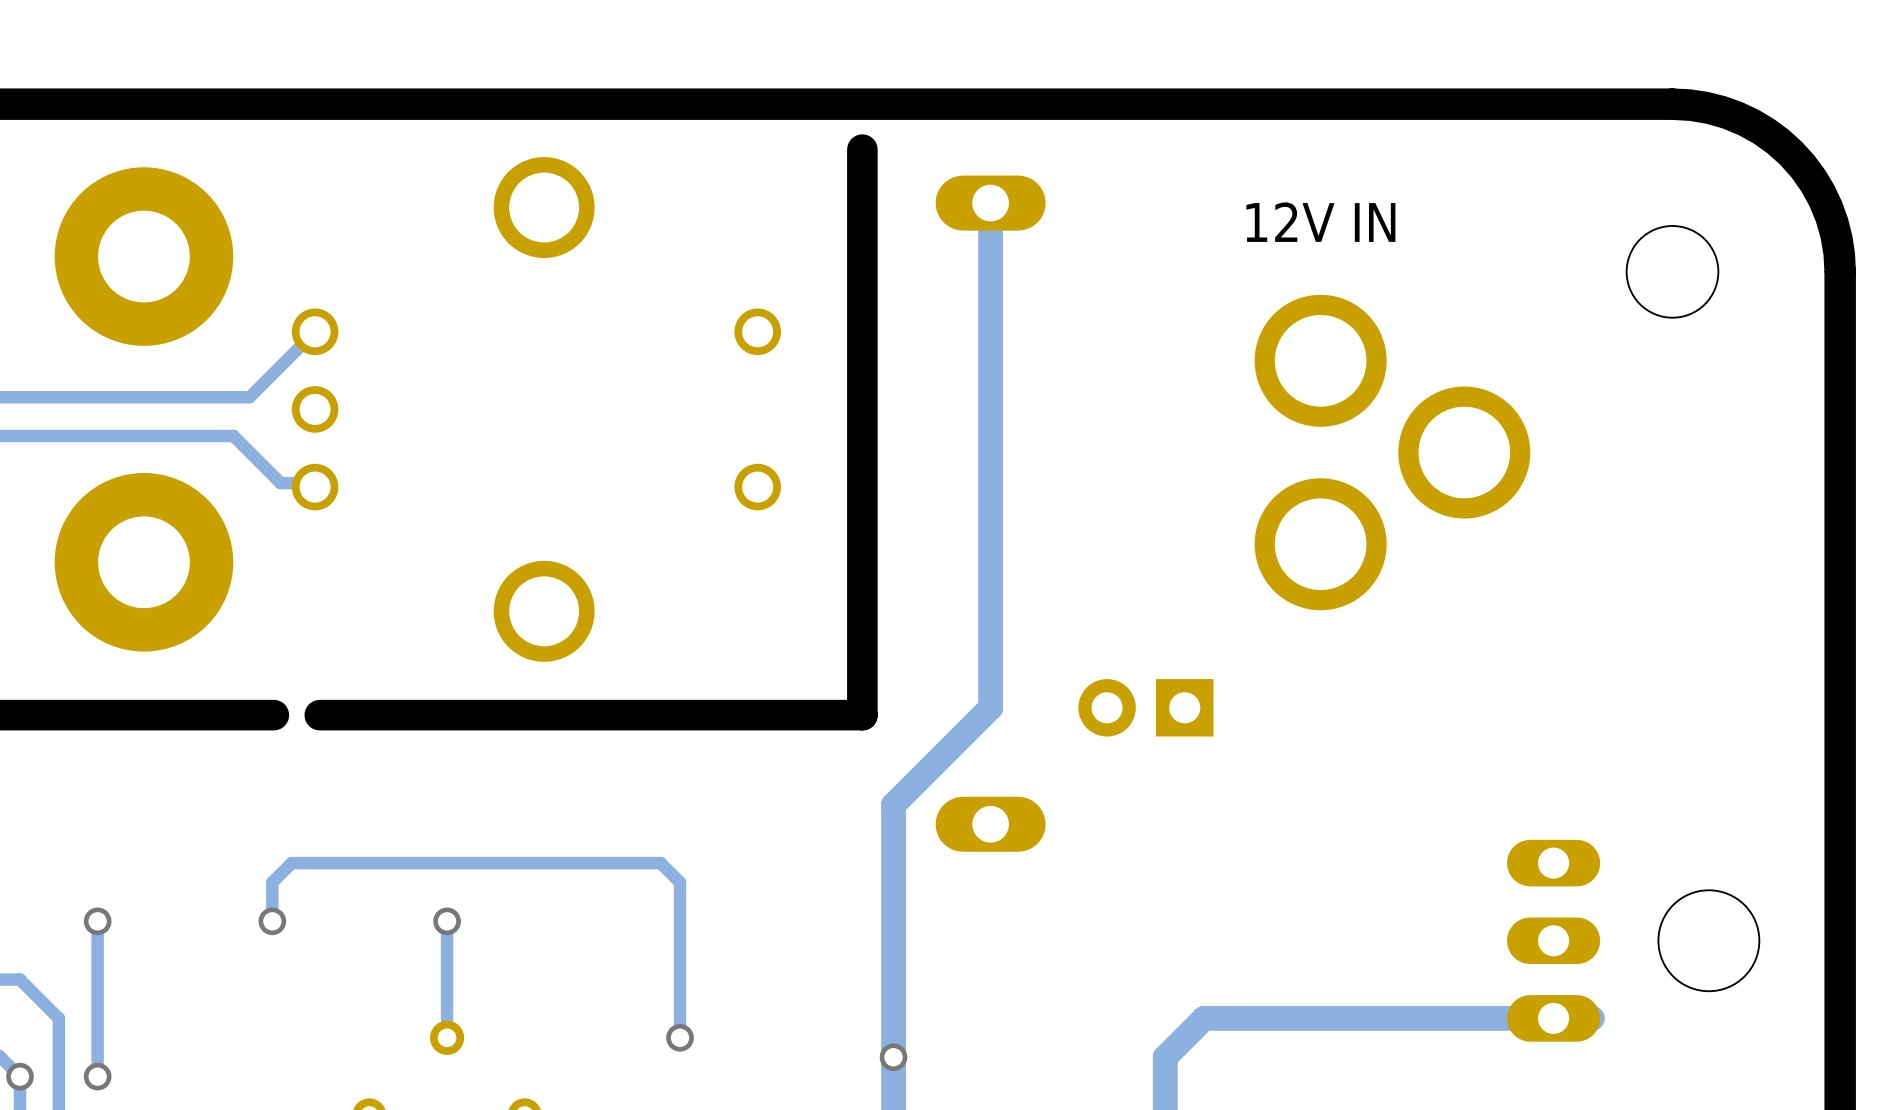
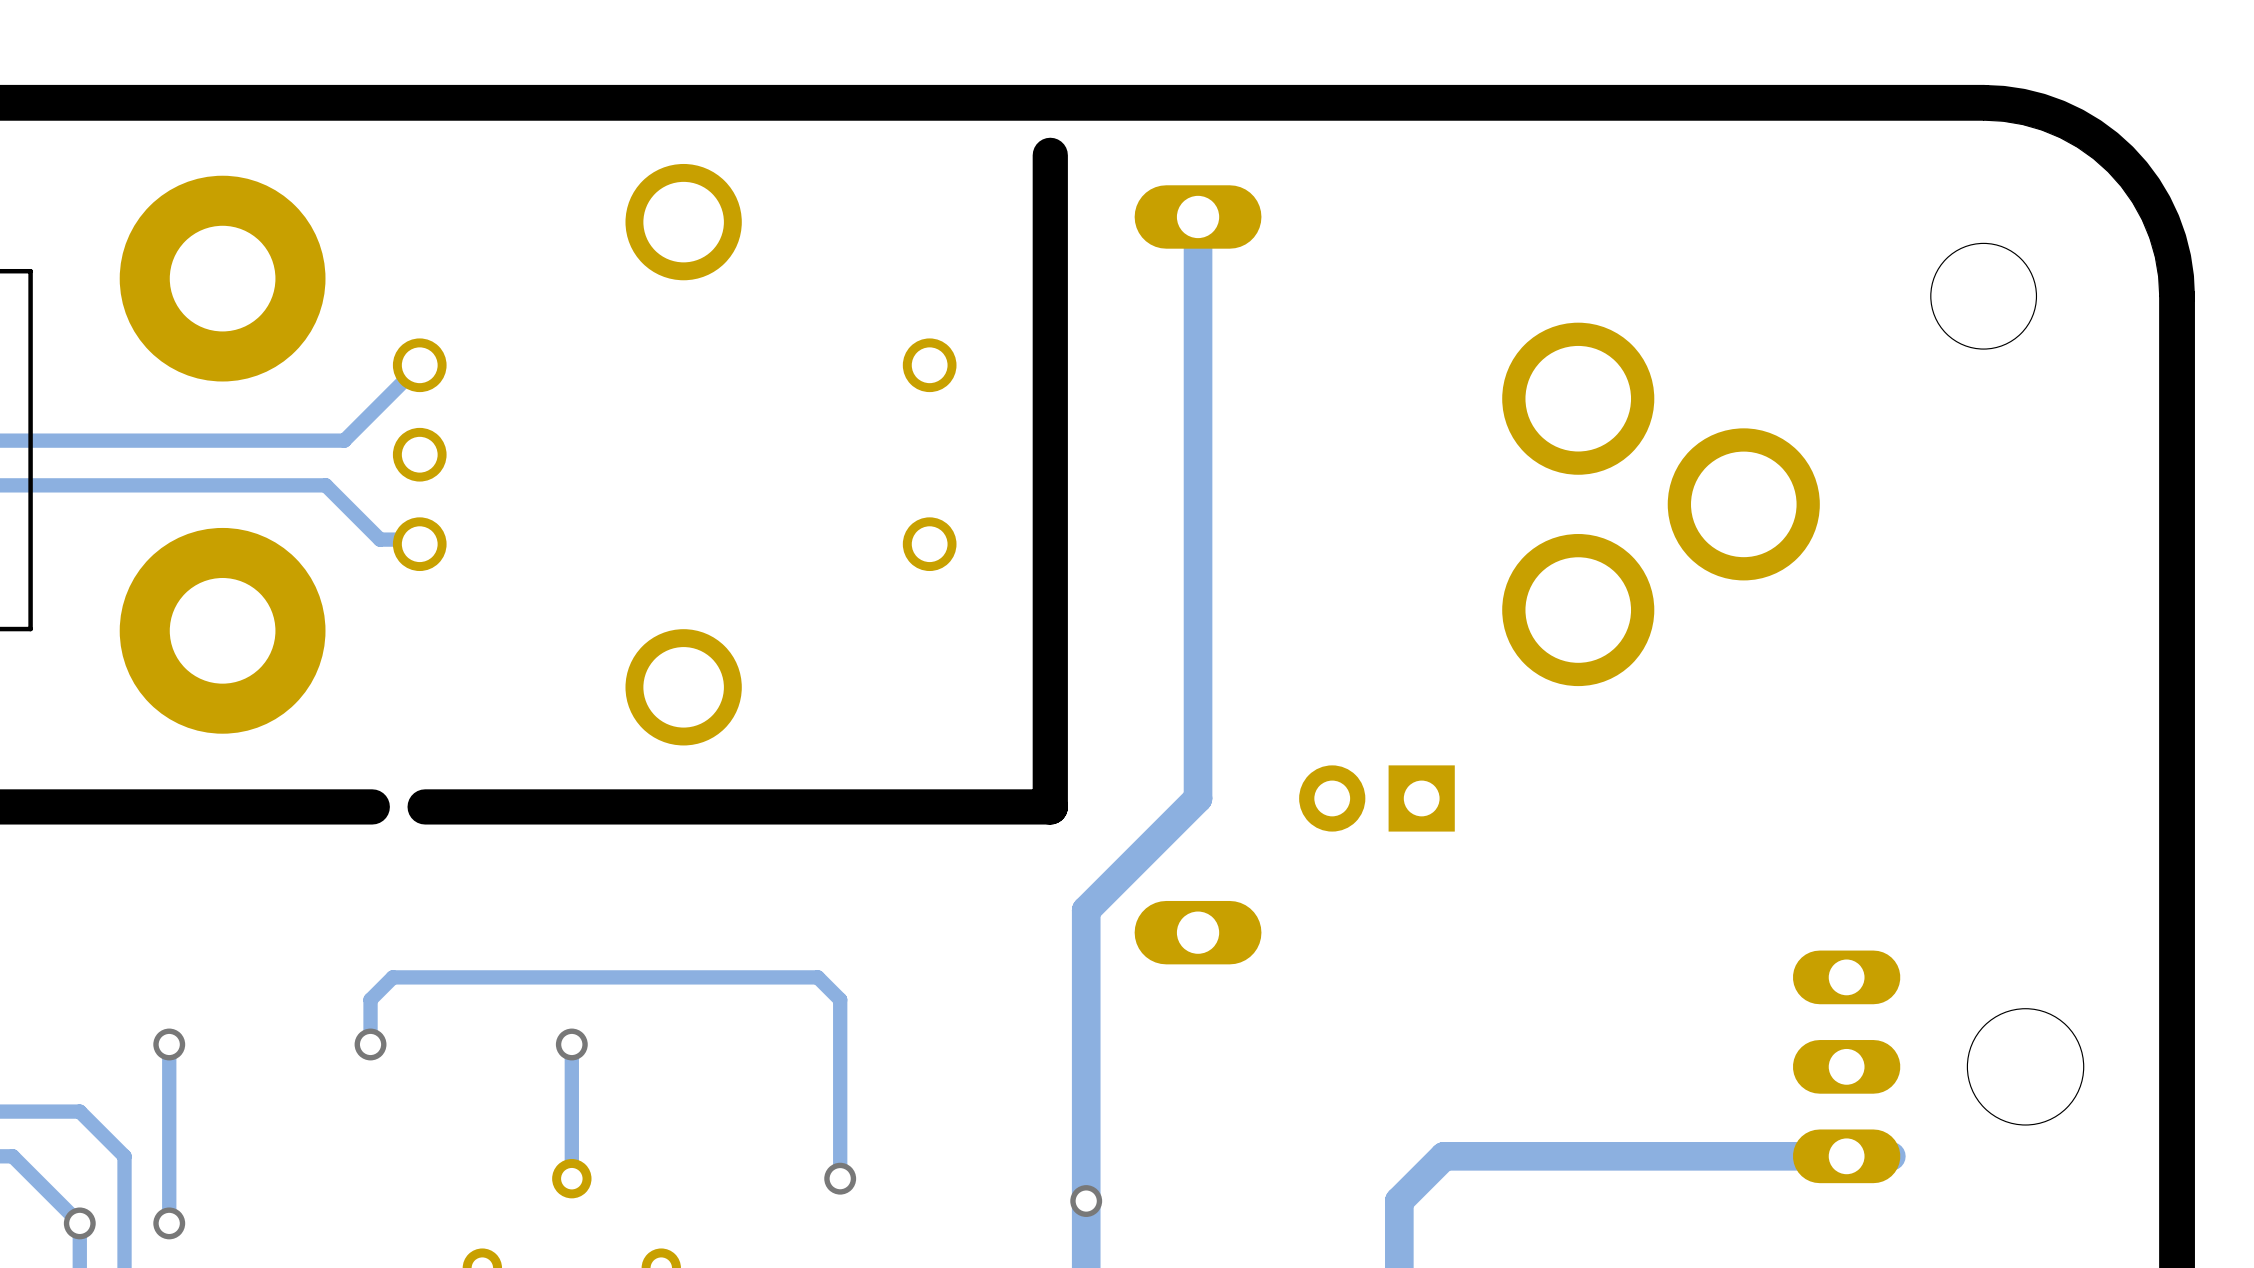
text: 12V IN (1320, 222) -> none

